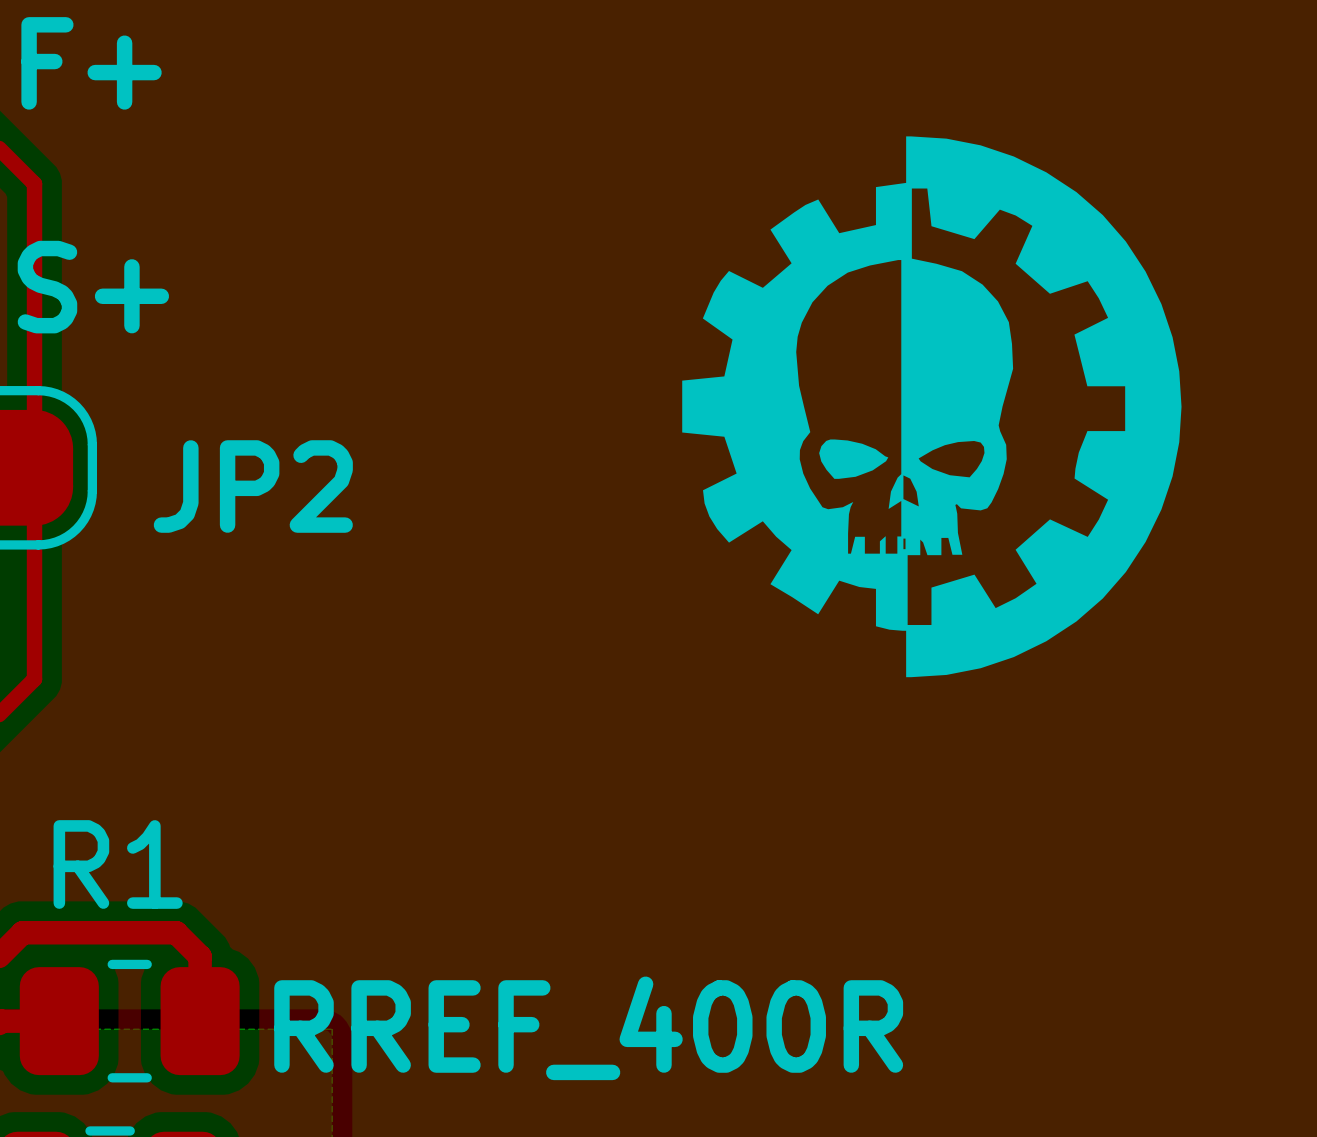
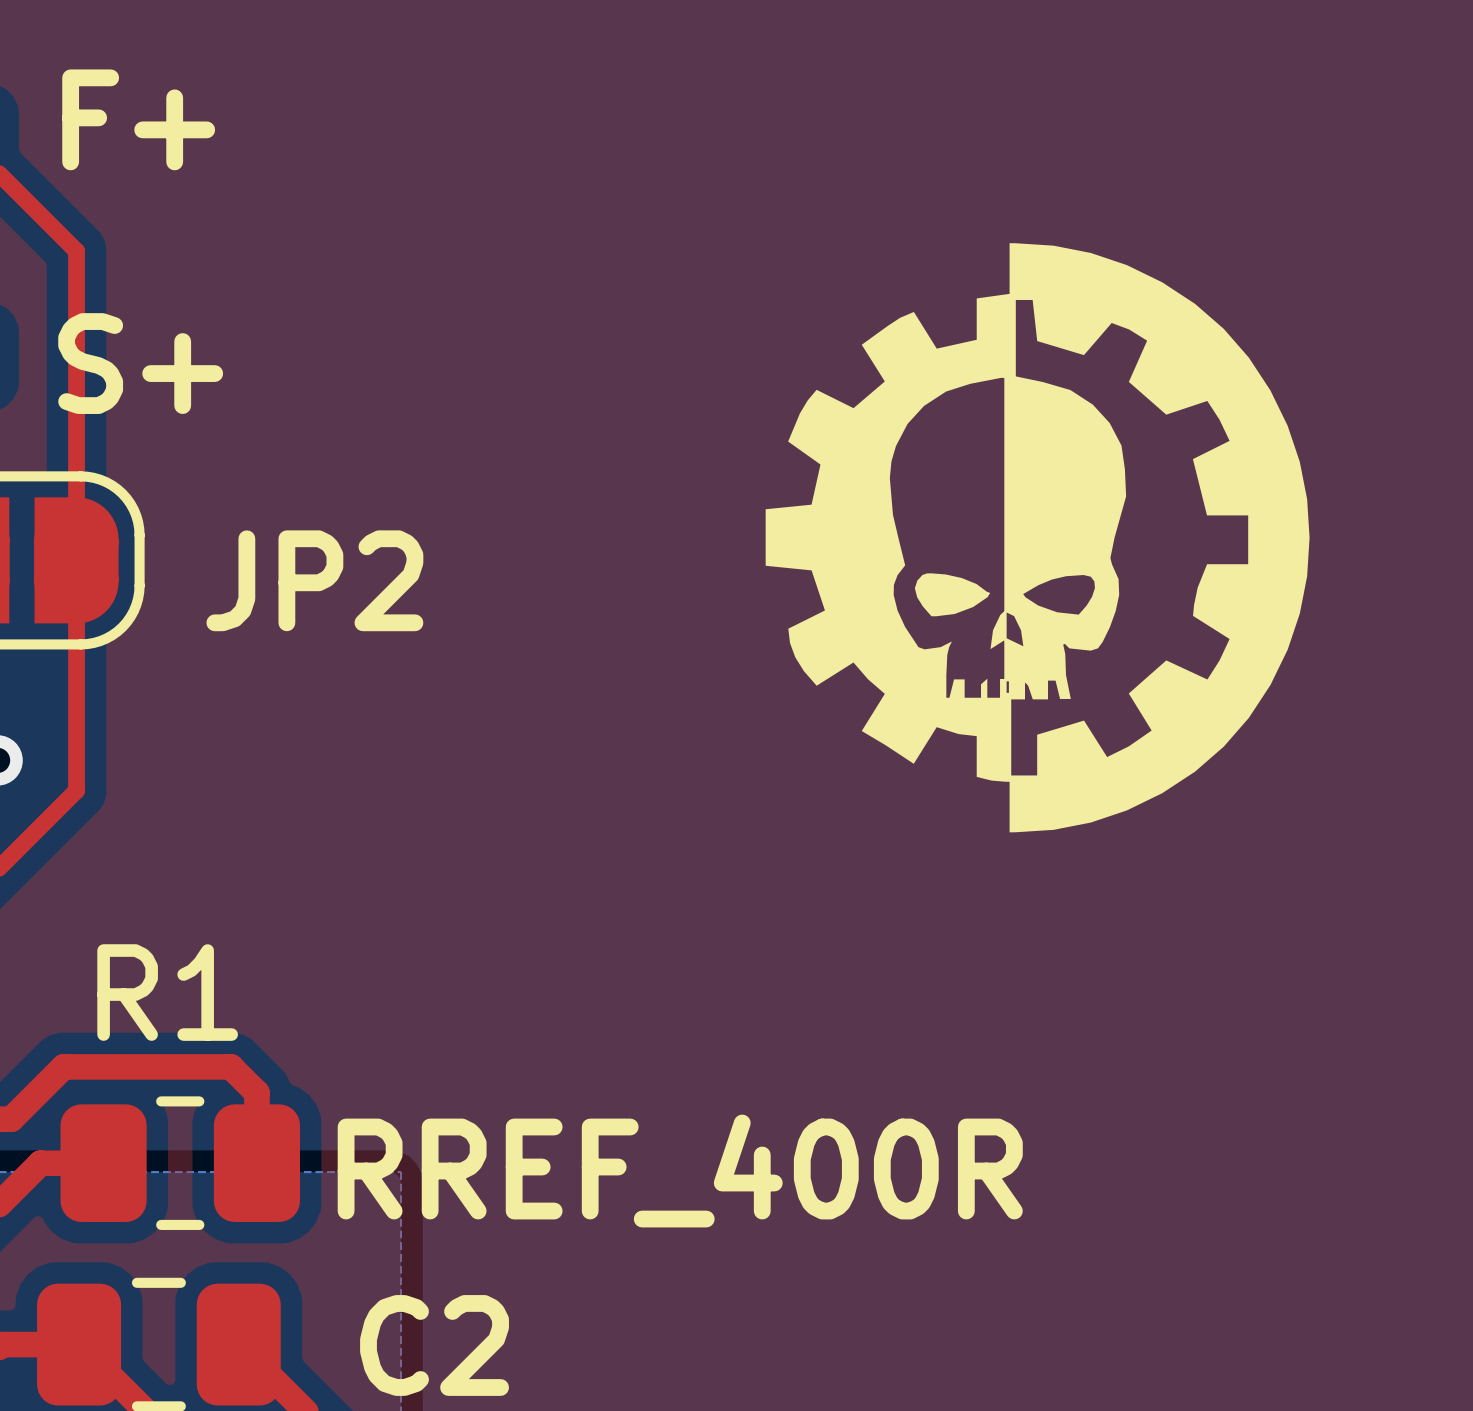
drawing position: (931, 406) -> (1037, 537)
drawing position: (853, 459) -> (952, 594)

